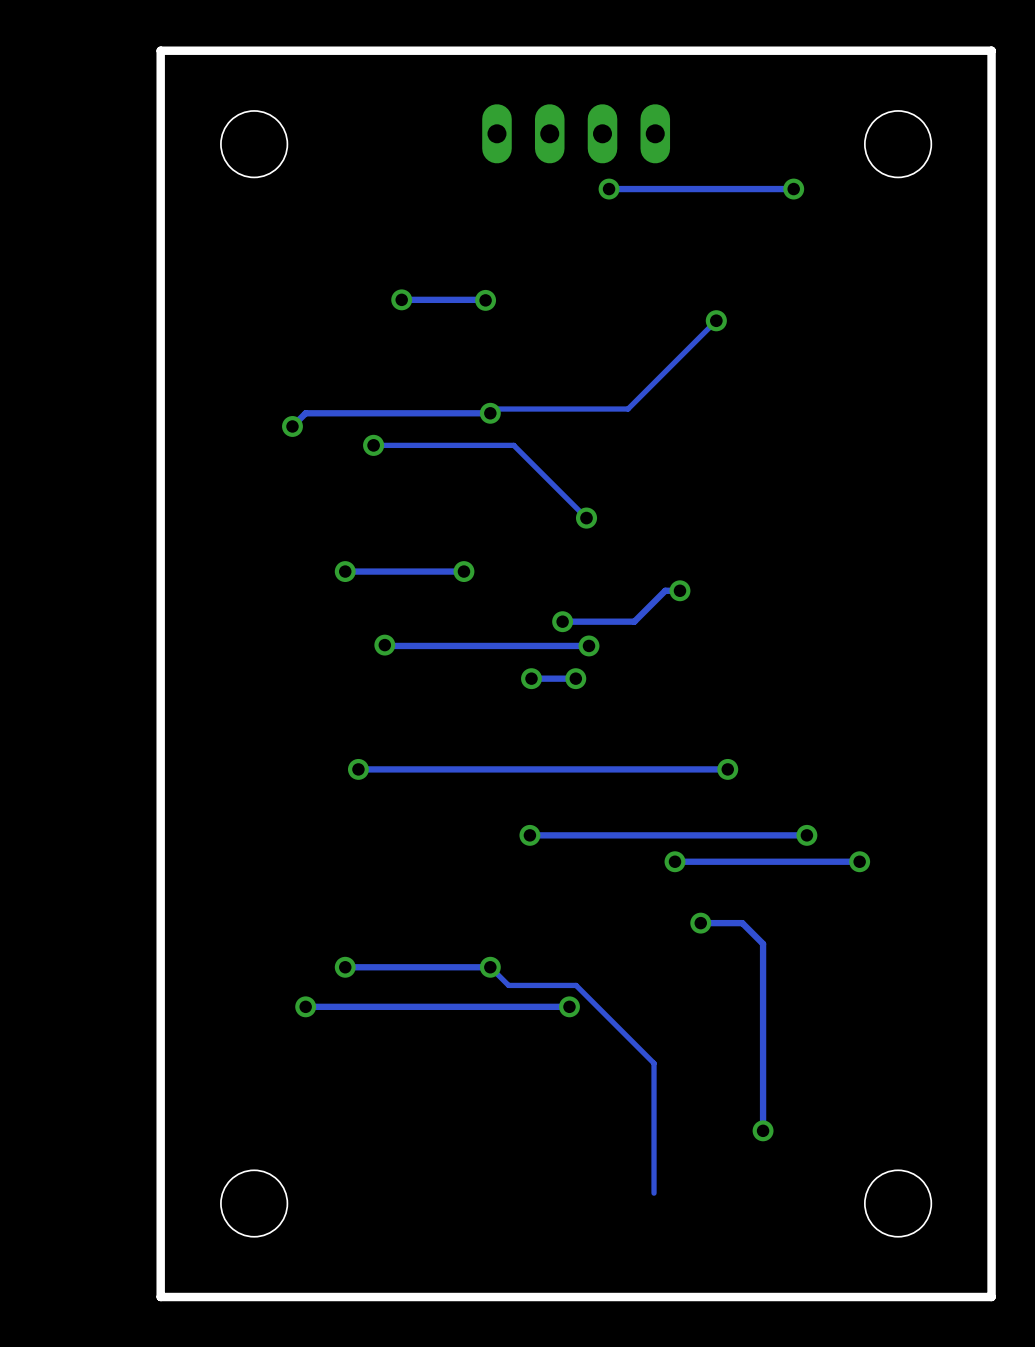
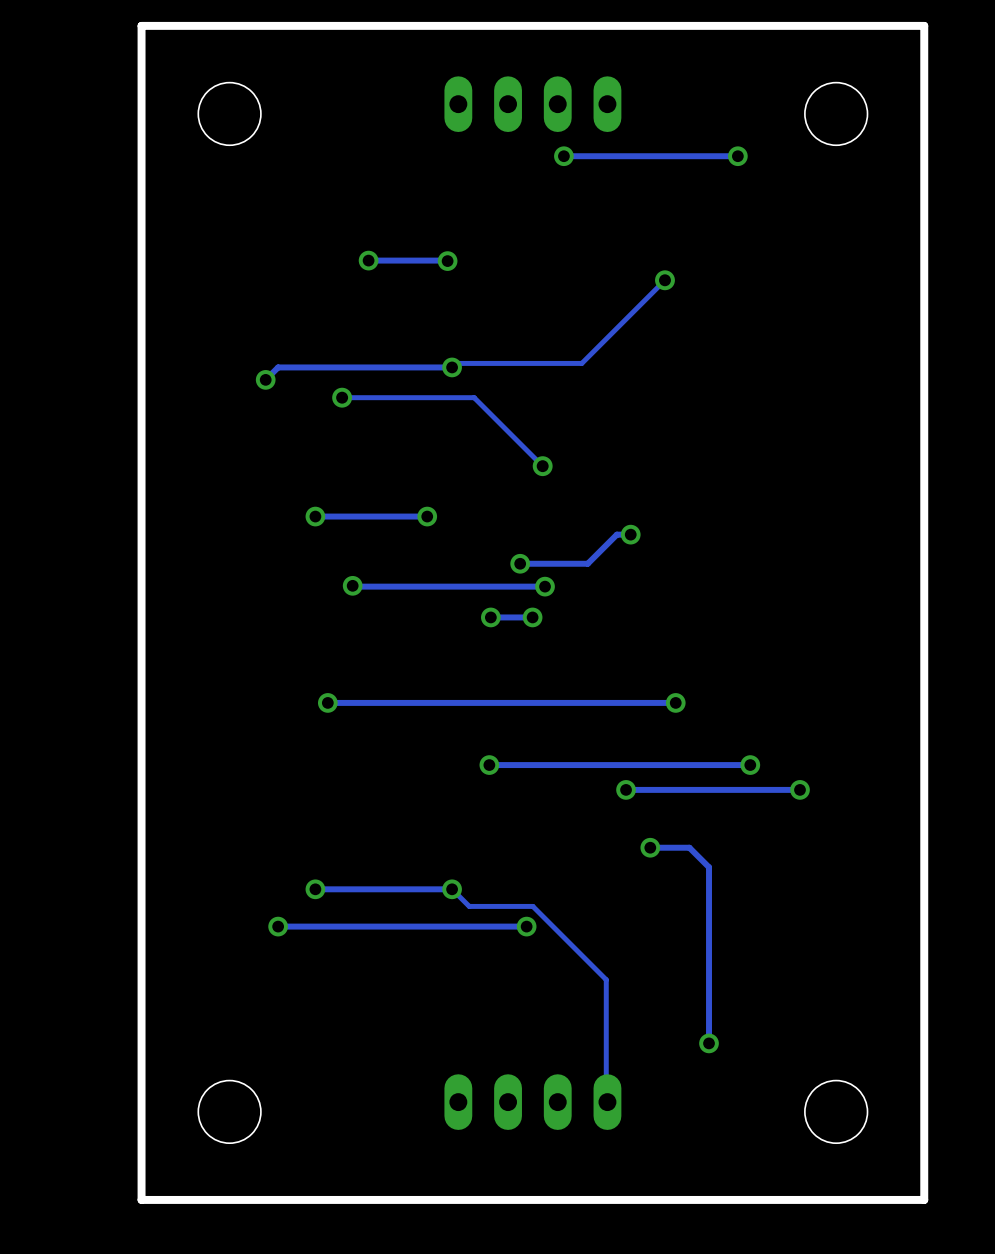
part: none -> (532, 1102)

